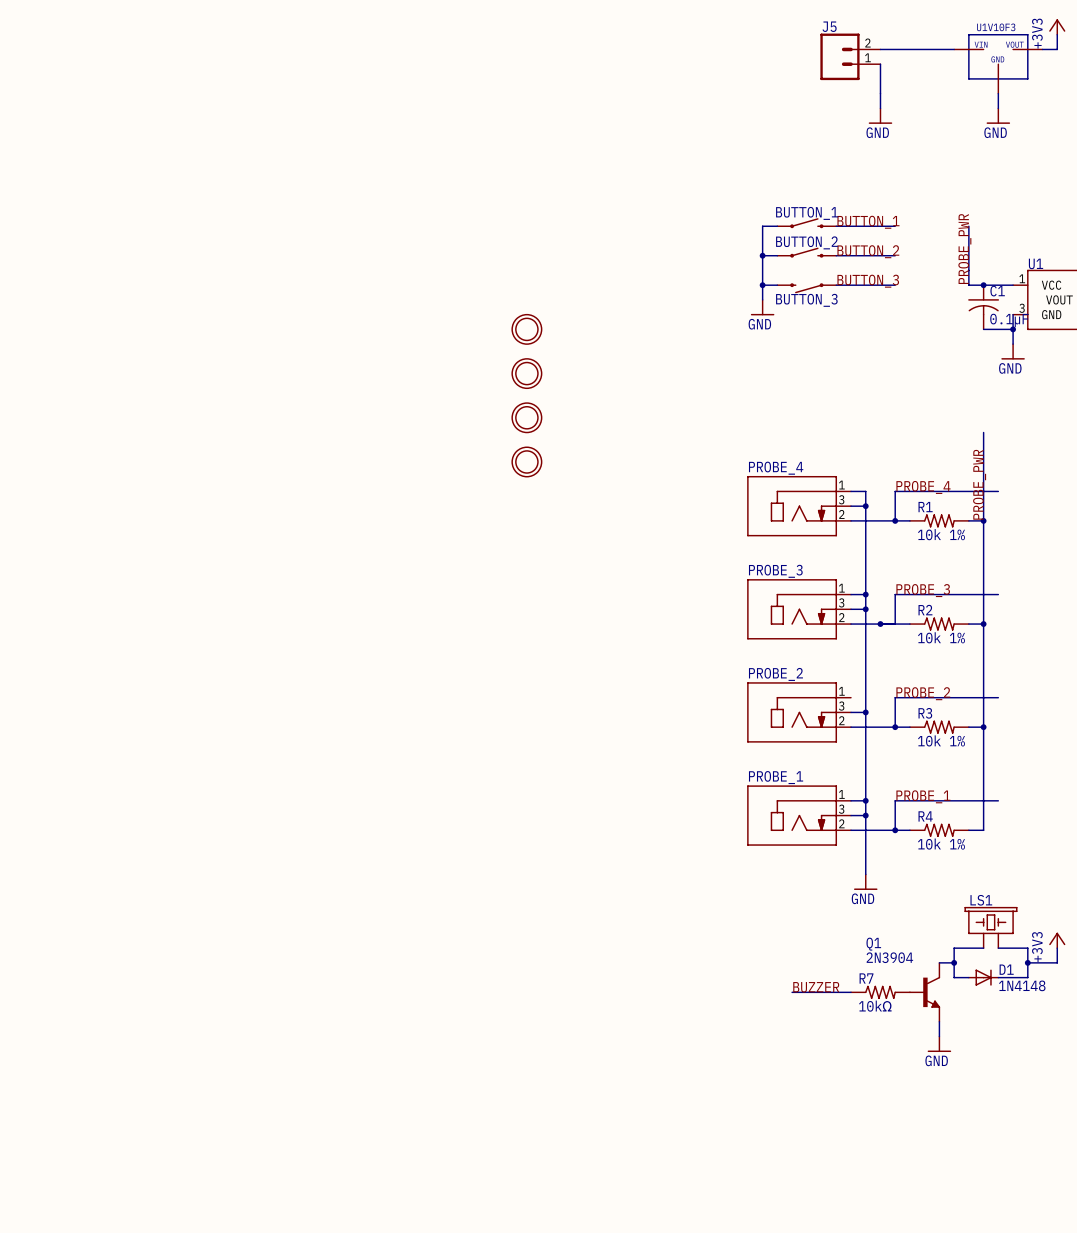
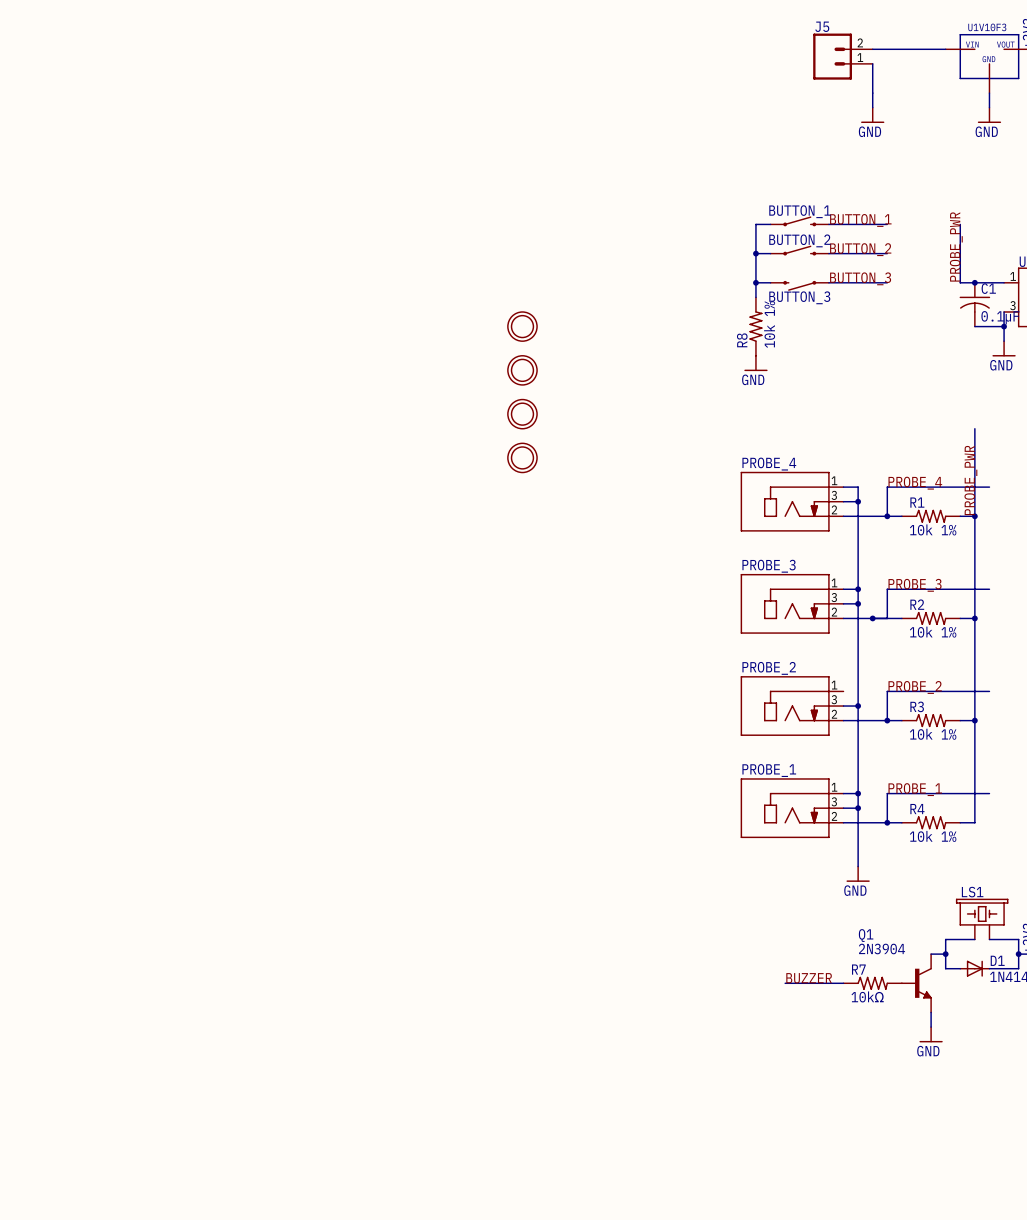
power symbol position: GND (762, 307) -> GND (755, 363)
R8: none -> 10k 1% (755, 326)

